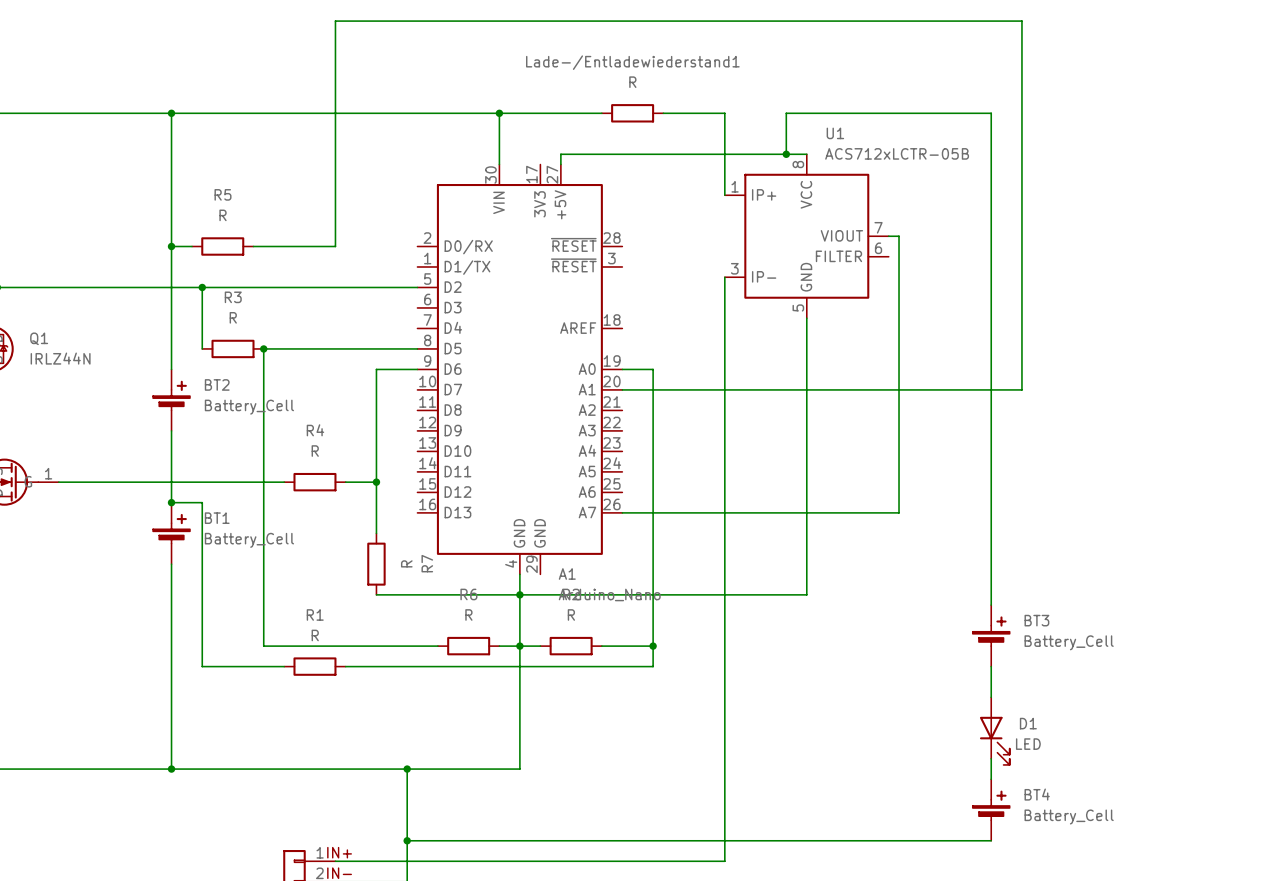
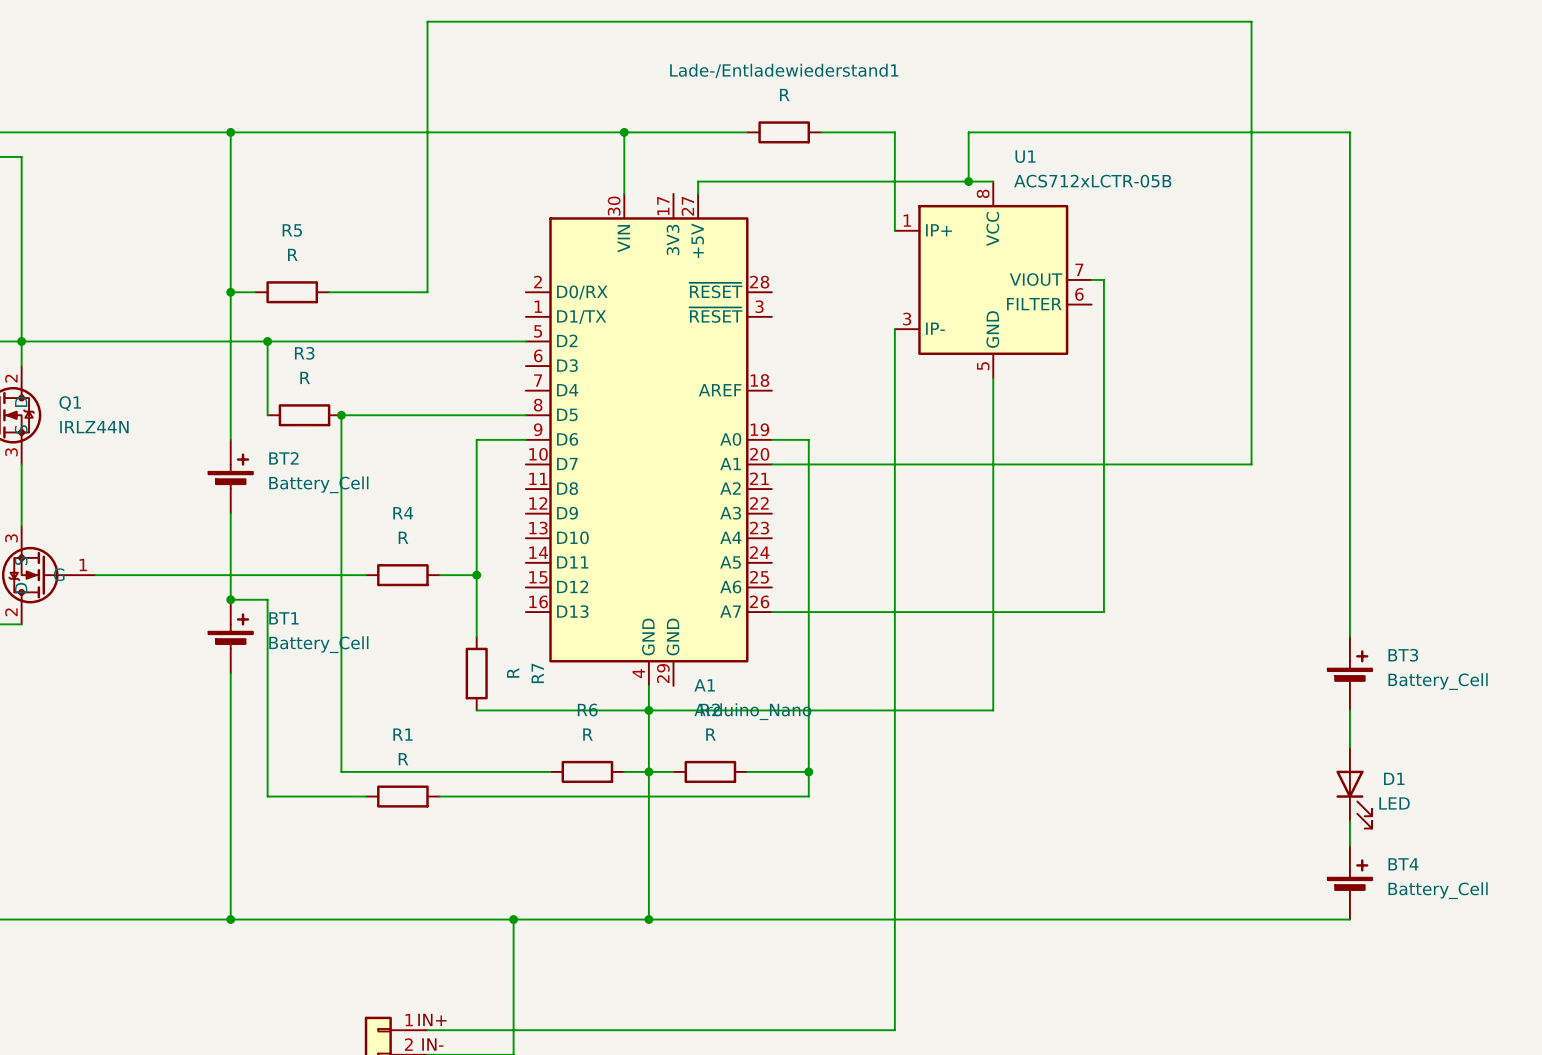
wire: (991, 113) (991, 605) -> (1214, 132) (1349, 132) (1349, 636)
BT3 position: (991, 635) -> (1349, 673)
wire: (991, 666) (991, 697) -> (1349, 710) (1349, 747)
D1 position: (994, 731) -> (1354, 787)
wire: (991, 758) (991, 779) -> (1349, 821) (1349, 845)
junction: none -> (648, 919)
BT4 position: (991, 810) -> (1349, 882)
wire: (407, 840) (991, 840) -> (648, 919) (1349, 919)
junction: (407, 840) -> none

